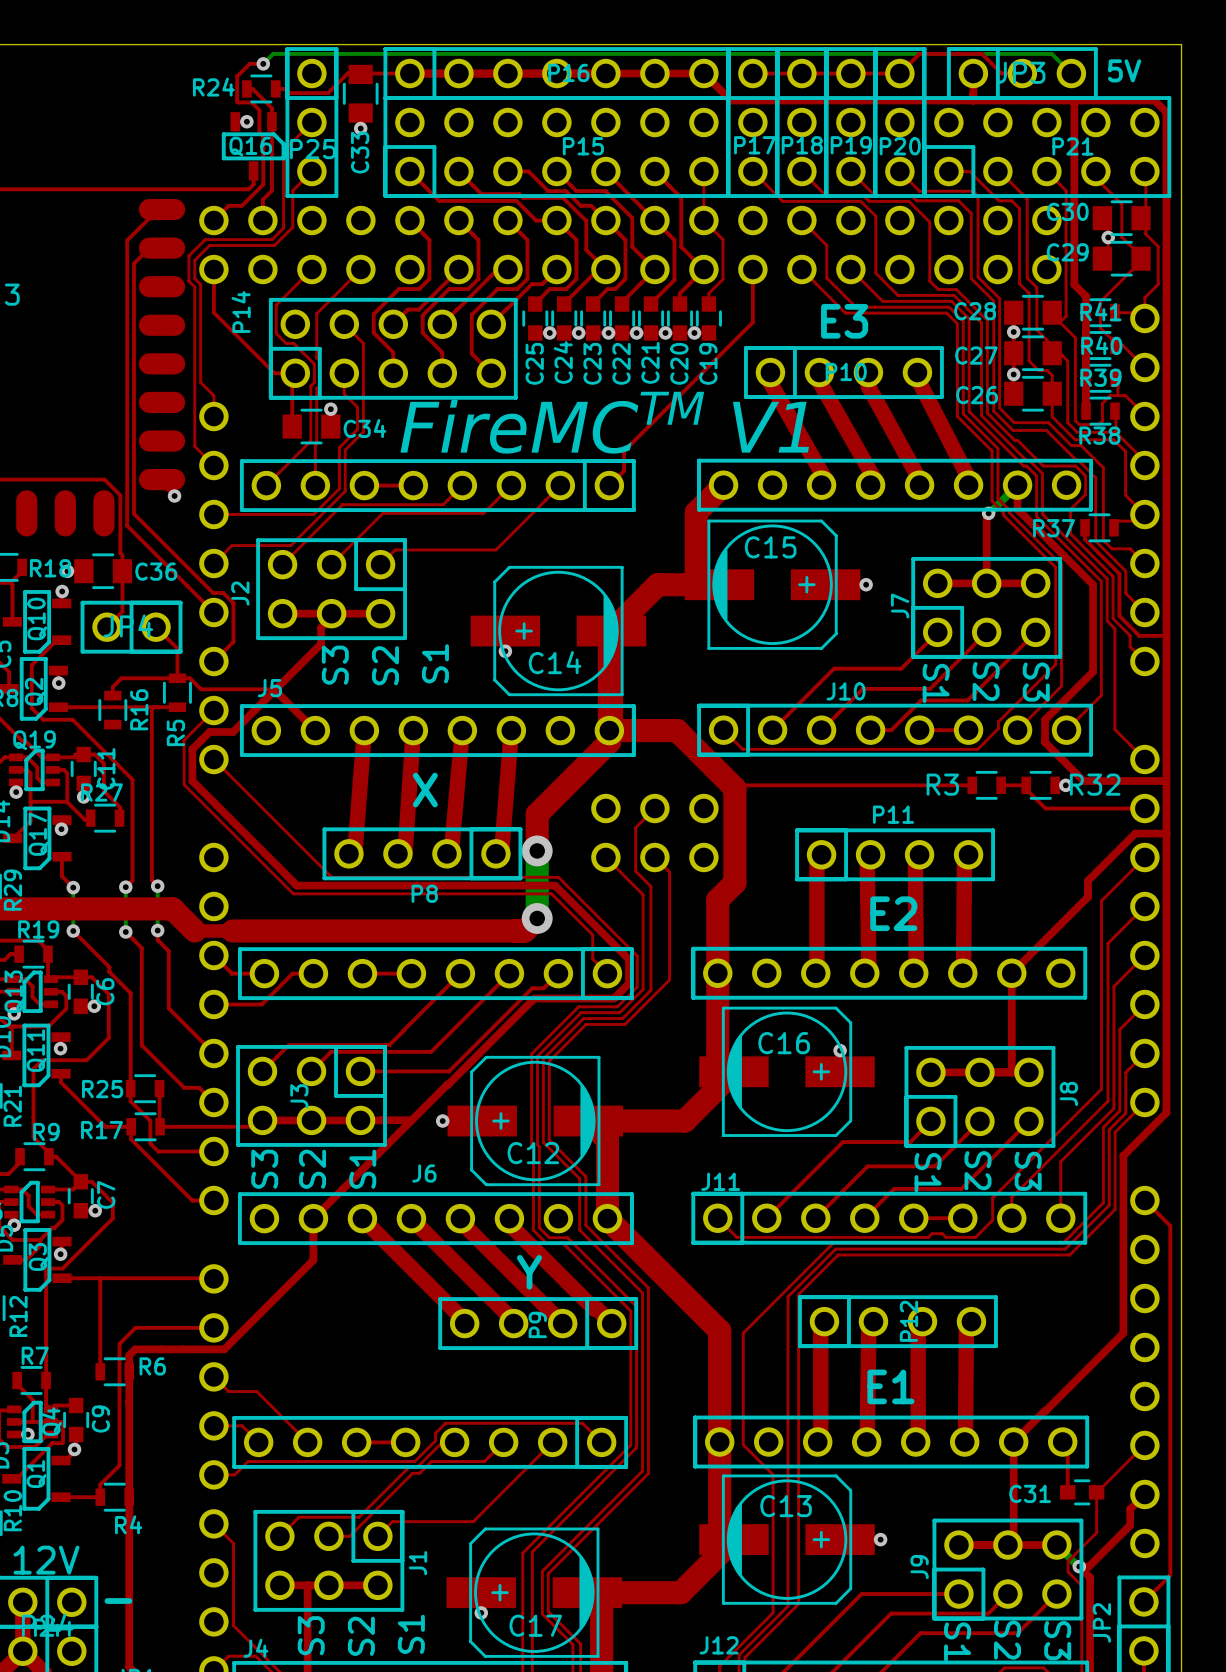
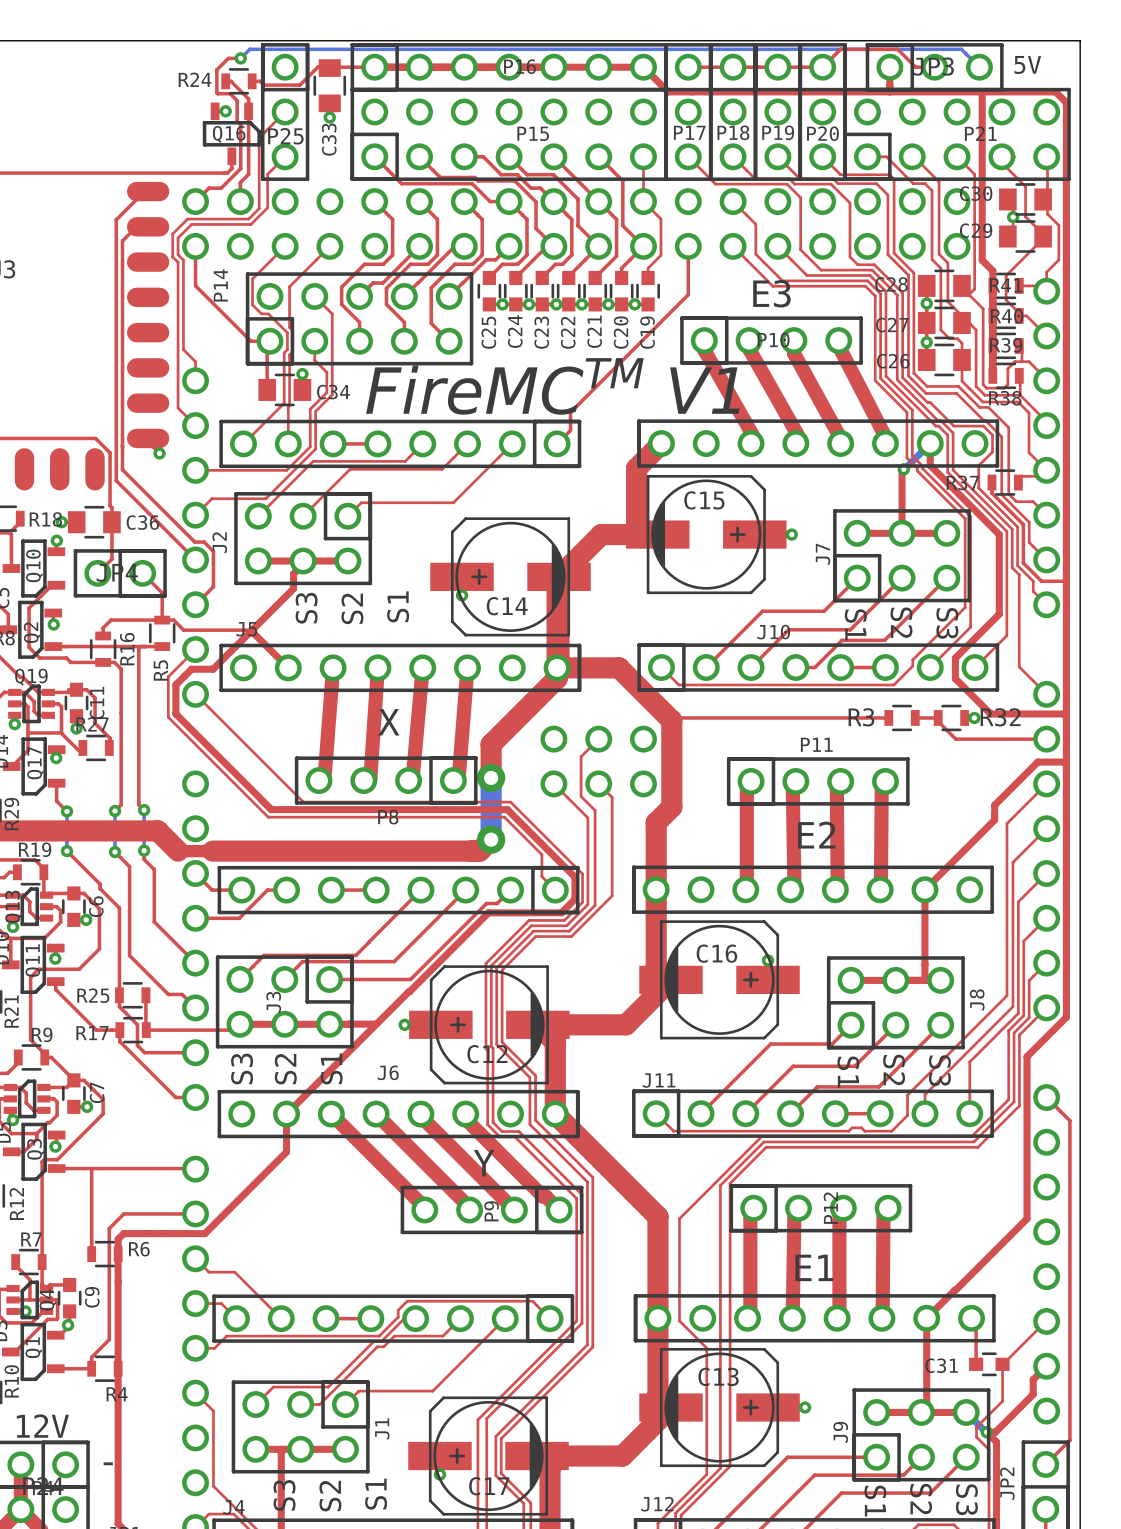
top track: (77, 724) (132, 779) -> (70, 662) (114, 662) (121, 668) (121, 712)

